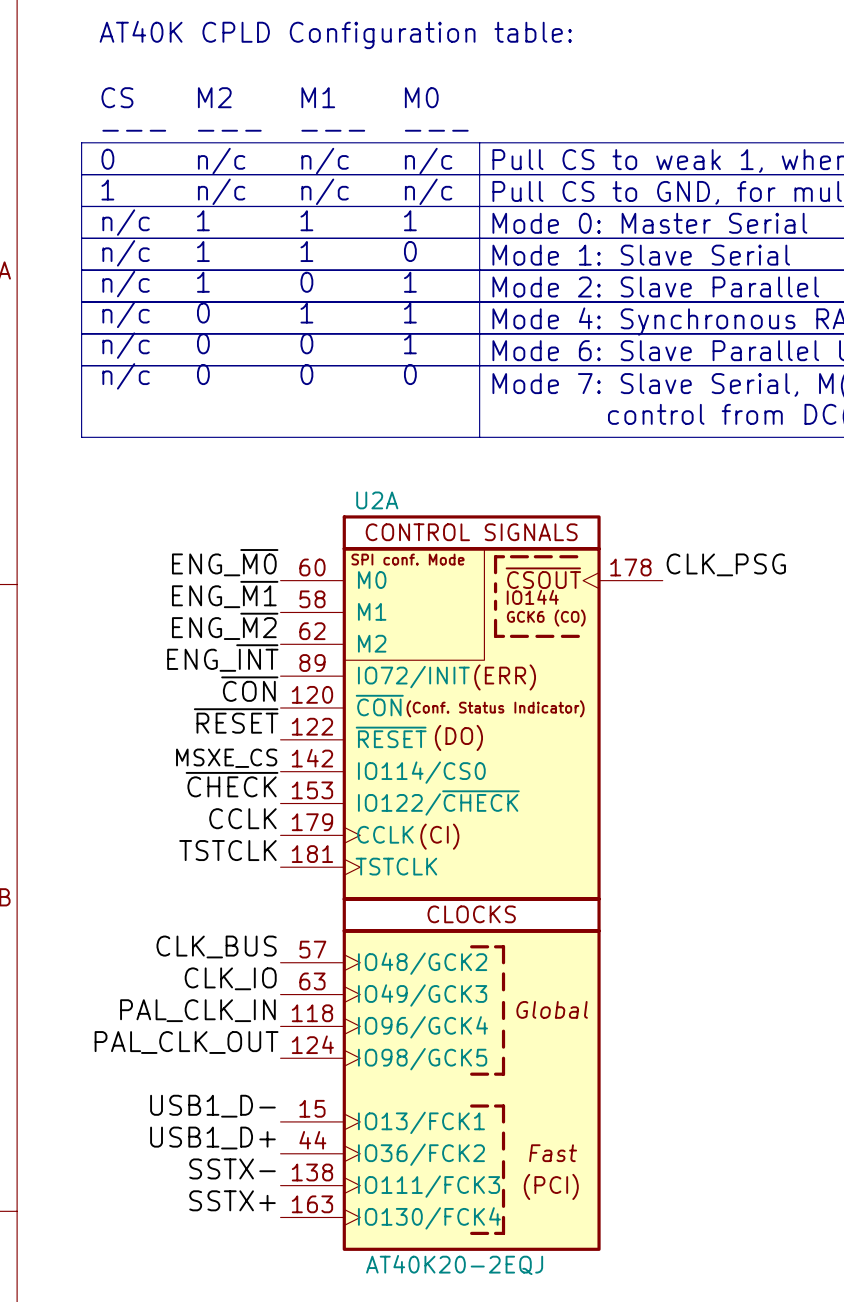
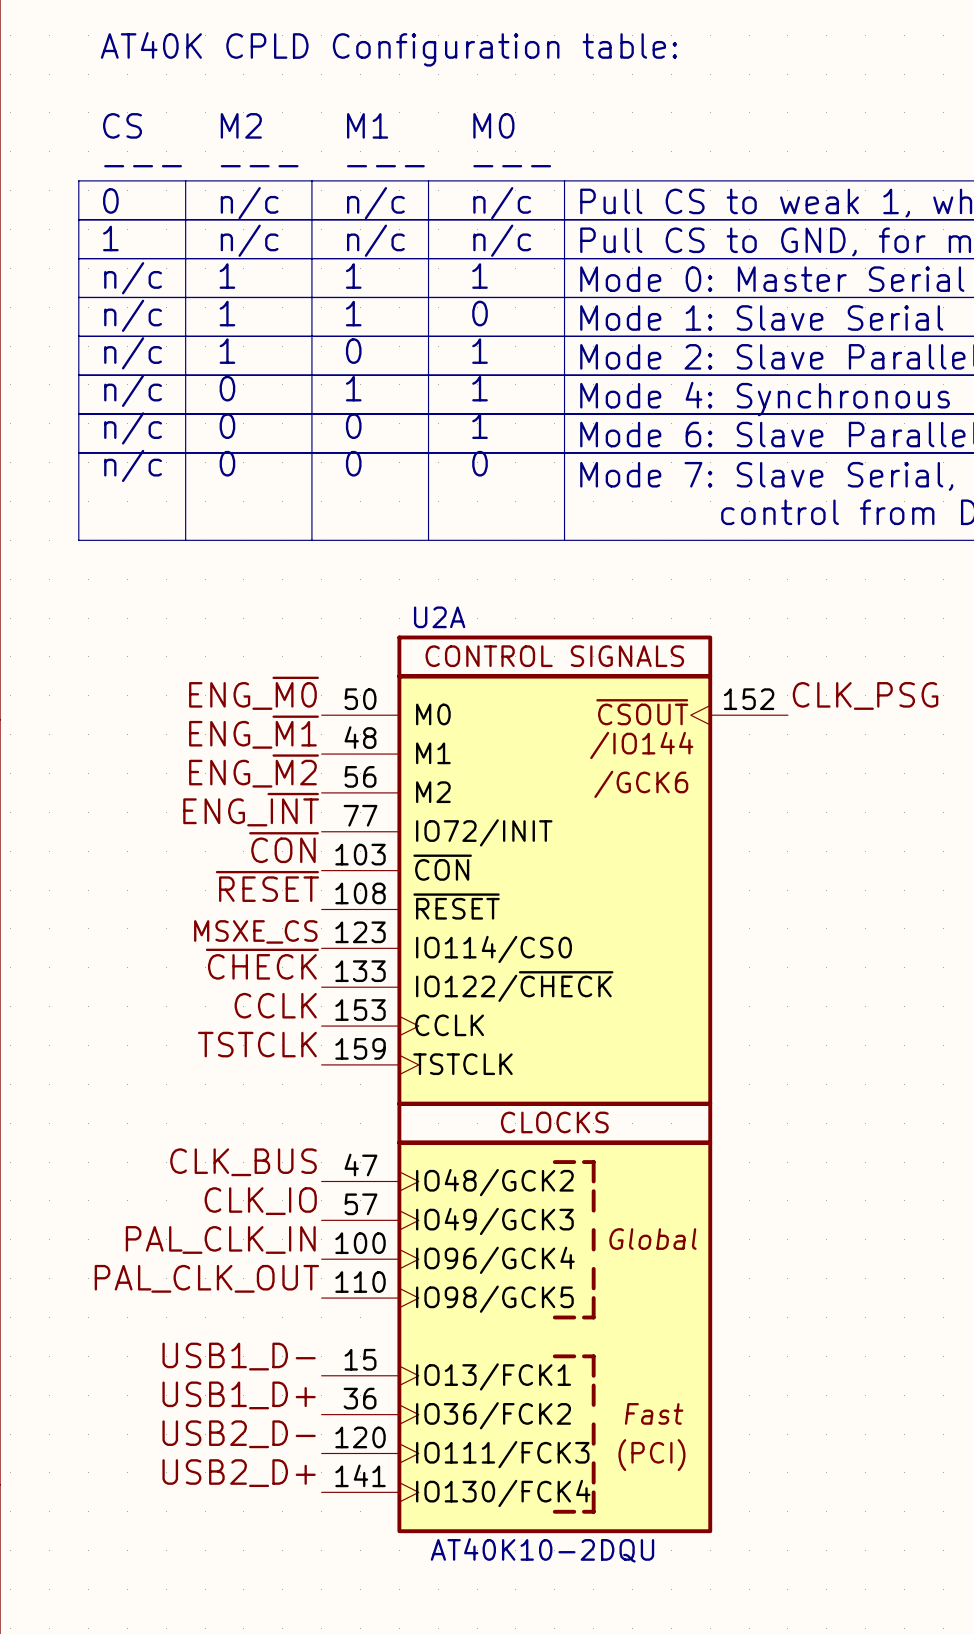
line: none -> (185, 180) (185, 540)
line: none -> (311, 180) (311, 540)
line: none -> (428, 180) (428, 540)
U2A symbol: [280, 515, 663, 1251] -> [321, 635, 788, 1534]
label: SSTX- (232, 1168) -> USB2_D- (239, 1434)
label: SSTX+ (232, 1200) -> USB2_D+ (239, 1473)
U2A value: AT40K20-2EQJ (454, 1265) -> AT40K10-2DQU (542, 1550)

